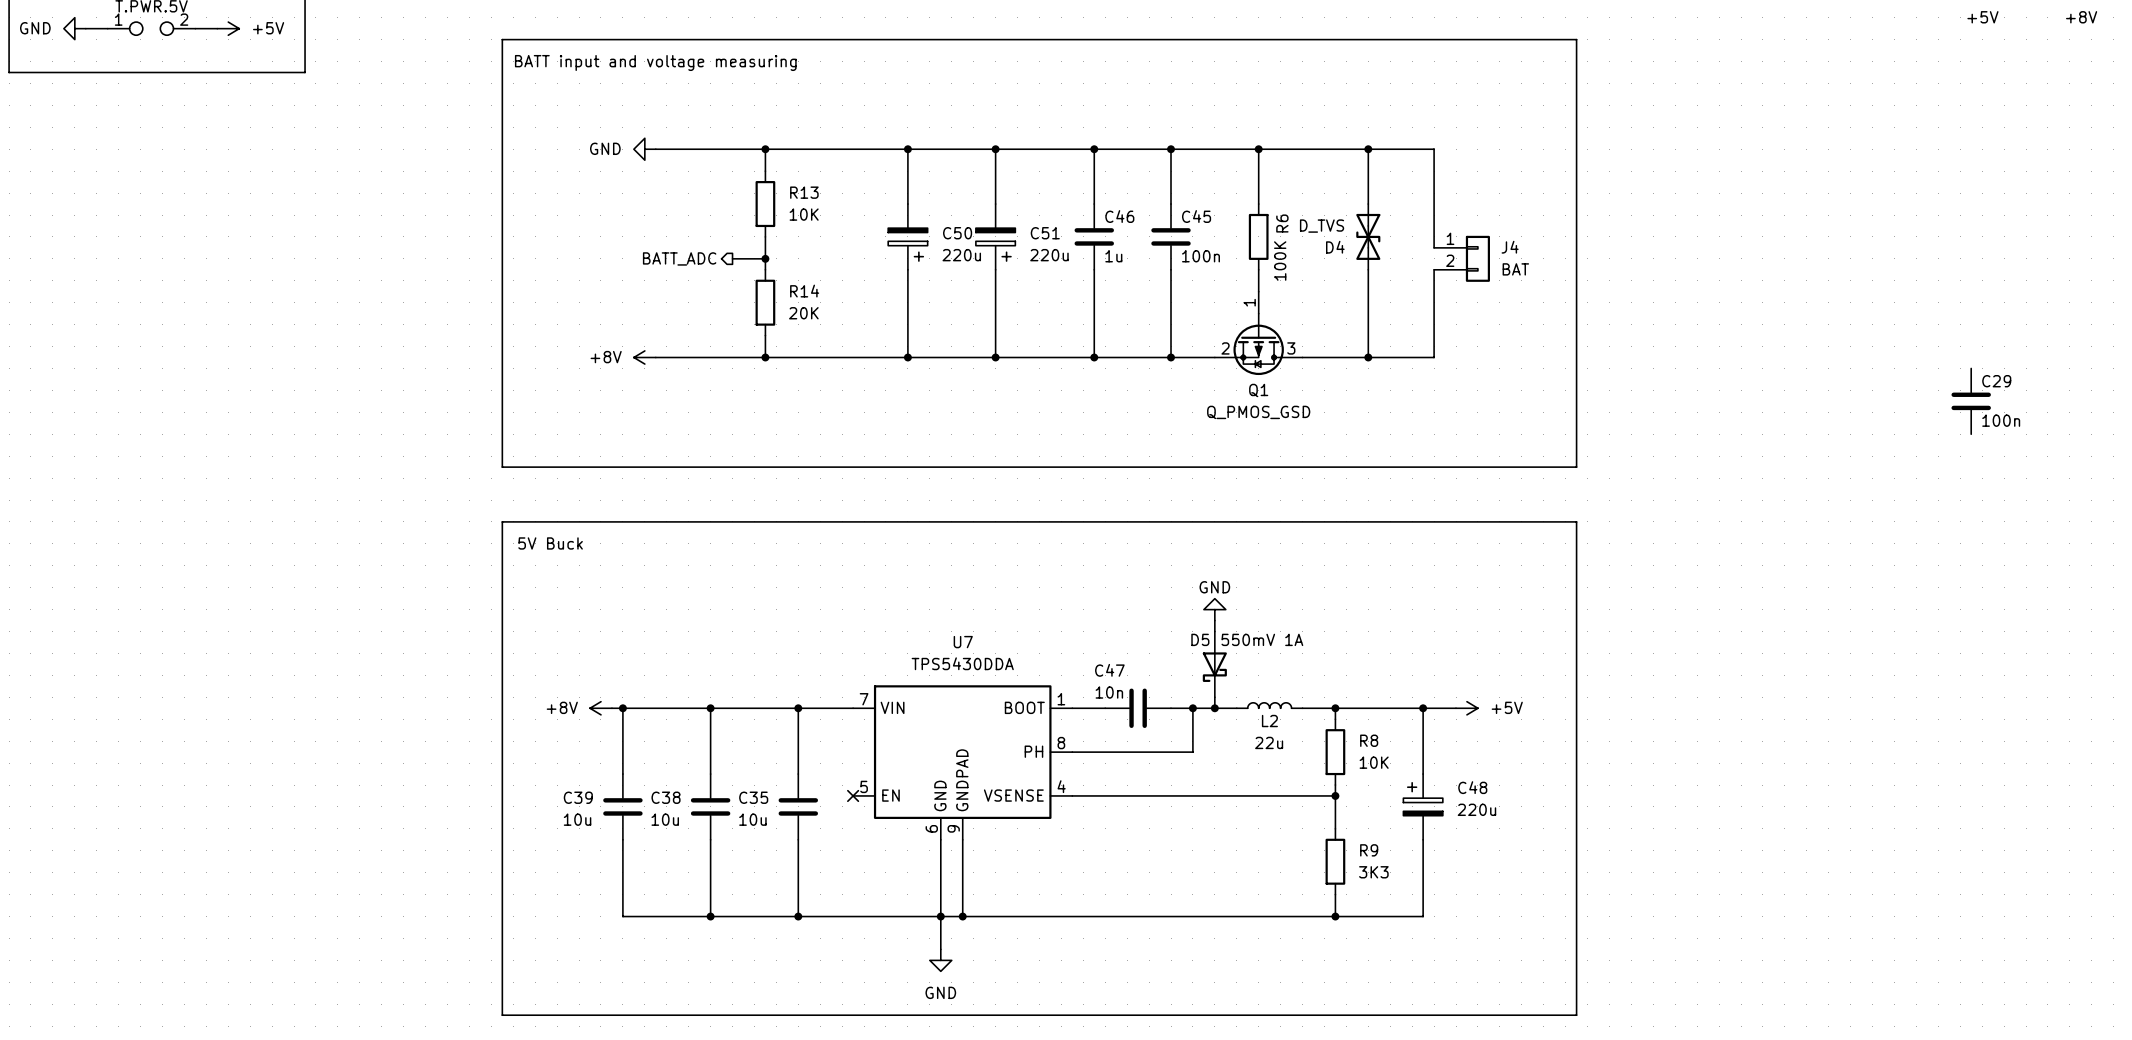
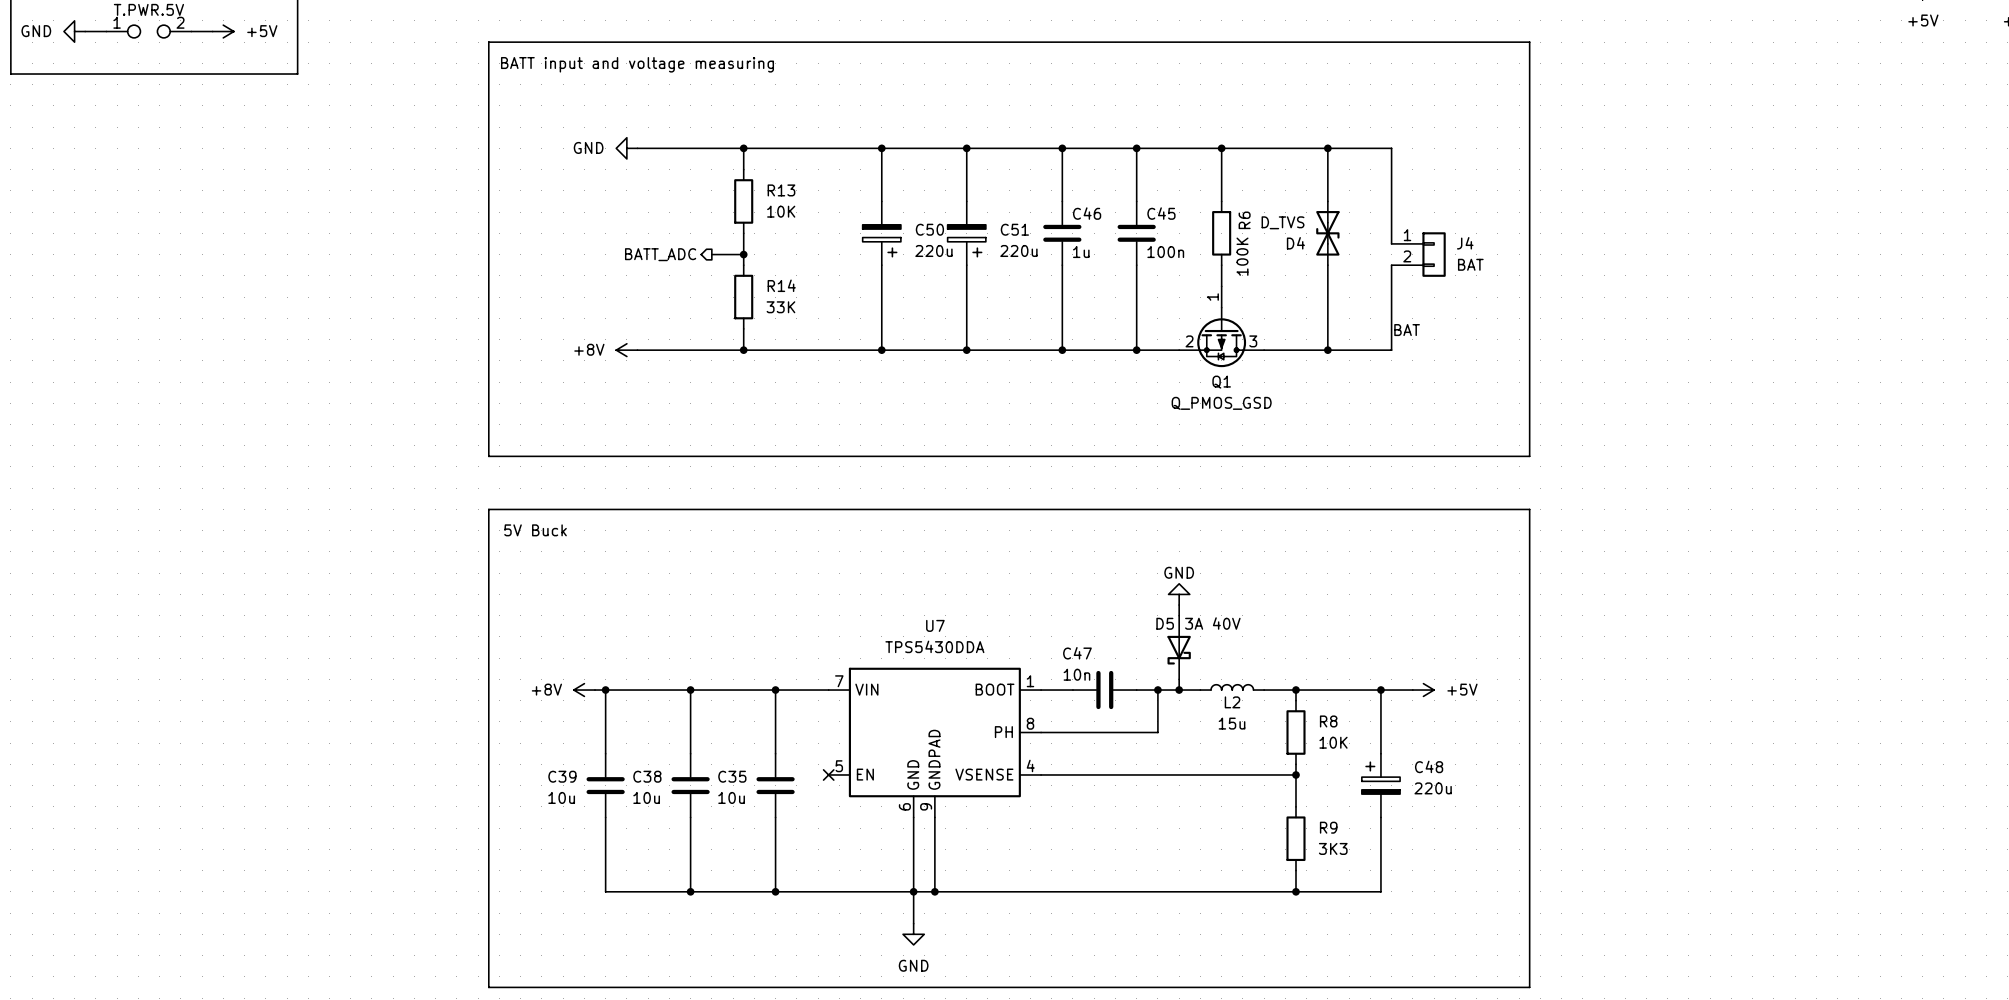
R14 value: 20K (803, 313) -> 33K (780, 307)
label: none -> BAT (1407, 330)
C29: 100n (1971, 401) -> none
D5 value: 550mV 1A (1262, 639) -> 3A 40V (1212, 623)
L2 value: 22u (1269, 742) -> 15u (1232, 723)

